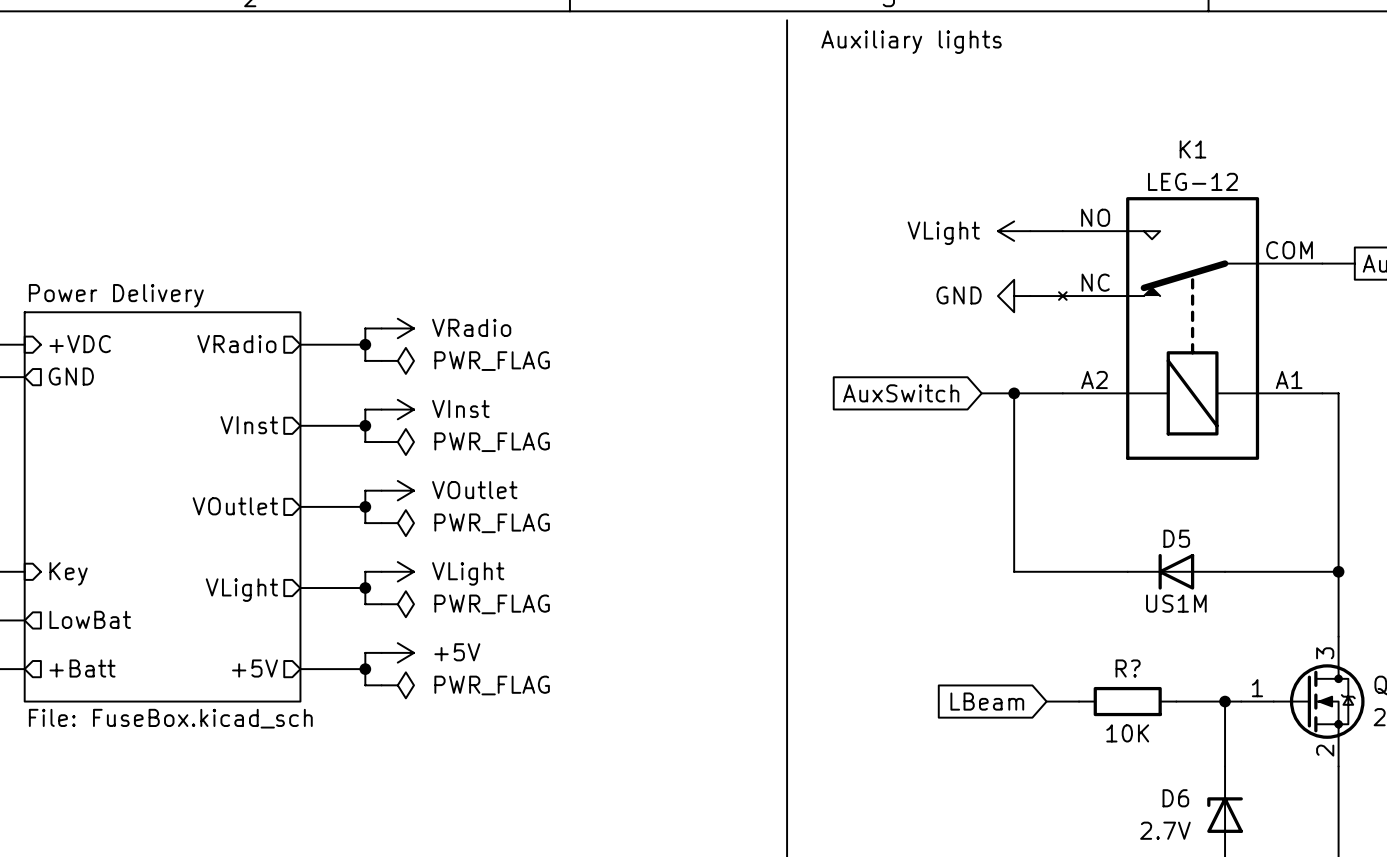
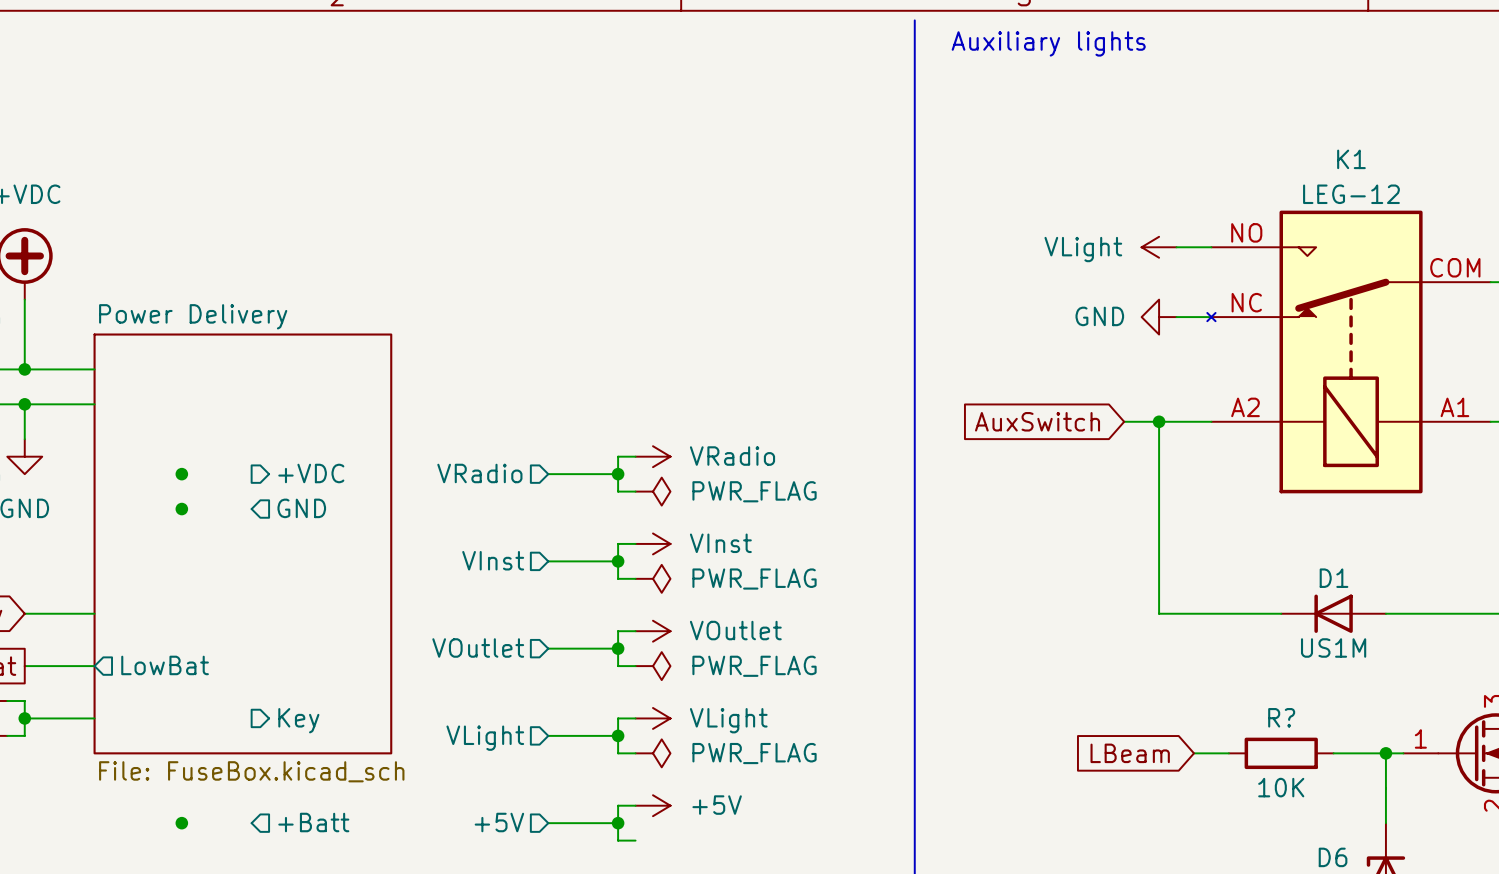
wire: (381, 328) (365, 328) (365, 360) (381, 360) -> (635, 456) (618, 456) (618, 491) (635, 491)
power symbol position: VRadio (397, 328) -> VRadio (653, 456)
sheet pin position: +VDC (80, 344) -> +VDC (311, 473)
sheet pin position: VRadio (236, 344) -> VRadio (479, 473)
wire: (300, 344) (365, 344) -> (548, 474) (618, 474)
junction: (365, 344) -> none
power symbol: PWR_FLAG (397, 360) -> none
sheet pin position: GND (71, 376) -> GND (301, 508)
wire: (381, 409) (365, 409) (365, 442) (381, 442) -> (635, 543) (618, 543) (618, 578) (635, 578)
power symbol position: VInst (397, 409) -> VInst (653, 543)
sheet pin position: VInst (249, 425) -> VInst (493, 560)
wire: (300, 425) (365, 425) -> (548, 561) (618, 561)
junction: (365, 425) -> none
junction: none -> (181, 474)
power symbol: PWR_FLAG (397, 442) -> none
junction: none -> (618, 474)
power symbol: none -> PWR_FLAG (653, 491)
junction: none -> (181, 509)
wire: (381, 490) (365, 490) (365, 523) (381, 523) -> (635, 631) (618, 631) (618, 666) (635, 666)
power symbol position: VOutlet (397, 490) -> VOutlet (653, 631)
sheet pin position: VOutlet (235, 506) -> VOutlet (478, 647)
wire: (300, 506) (365, 506) -> (548, 648) (618, 648)
junction: (365, 506) -> none
power symbol: PWR_FLAG (397, 523) -> none
junction: none -> (618, 561)
D5 name: D5 (1176, 538) -> D1 (1334, 578)
power symbol: none -> PWR_FLAG (653, 578)
wire: (381, 571) (365, 571) (365, 604) (381, 604) -> (635, 718) (618, 718) (618, 753) (635, 753)
power symbol position: VLight (397, 571) -> VLight (653, 718)
sheet pin position: Key (68, 573) -> Key (298, 720)
wire: (300, 588) (365, 588) -> (548, 735) (618, 735)
junction: (365, 588) -> none
sheet pin position: VLight (241, 590) -> VLight (485, 738)
power symbol: PWR_FLAG (397, 604) -> none
junction: none -> (618, 648)
power symbol: none -> PWR_FLAG (653, 666)
wire: (381, 652) (365, 652) (365, 685) (381, 685) -> (635, 805) (618, 805) (618, 840) (635, 840)
power symbol position: +5V (397, 652) -> +5V (653, 805)
sheet pin position: +Batt (82, 668) -> +Batt (313, 822)
sheet pin position: +5V (255, 668) -> +5V (499, 822)
wire: (300, 669) (365, 669) -> (548, 823) (618, 823)
junction: (365, 669) -> none
power symbol: PWR_FLAG (397, 685) -> none
junction: none -> (618, 735)
power symbol: none -> PWR_FLAG (653, 753)
junction: none -> (181, 823)
junction: none -> (618, 823)

